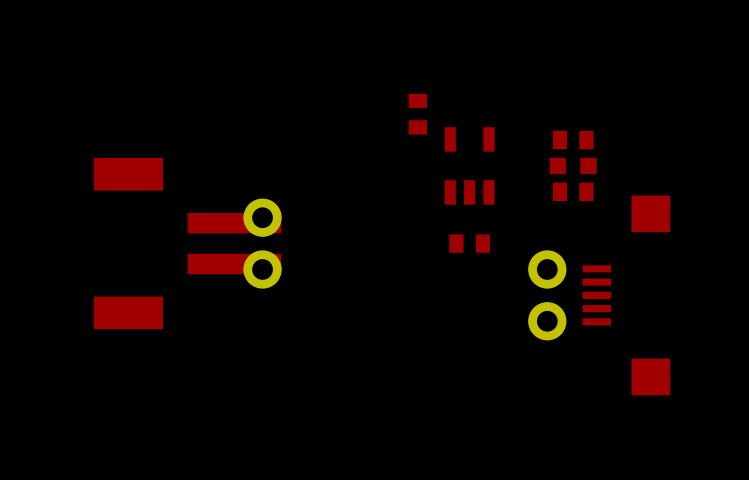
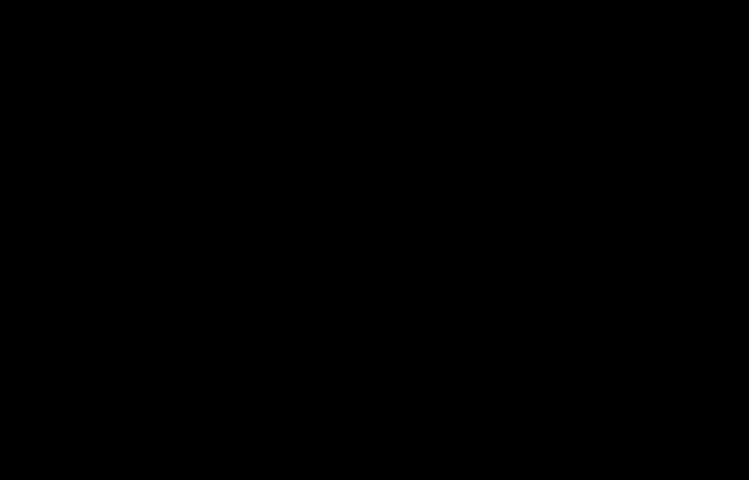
part: (417, 114) -> none
part: (573, 140) -> none
part: (469, 165) -> none
part: (573, 165) -> none
part: (573, 191) -> none
part: (187, 243) -> none
part: (262, 243) -> none
part: (469, 243) -> none
part: (547, 295) -> none
part: (626, 295) -> none

